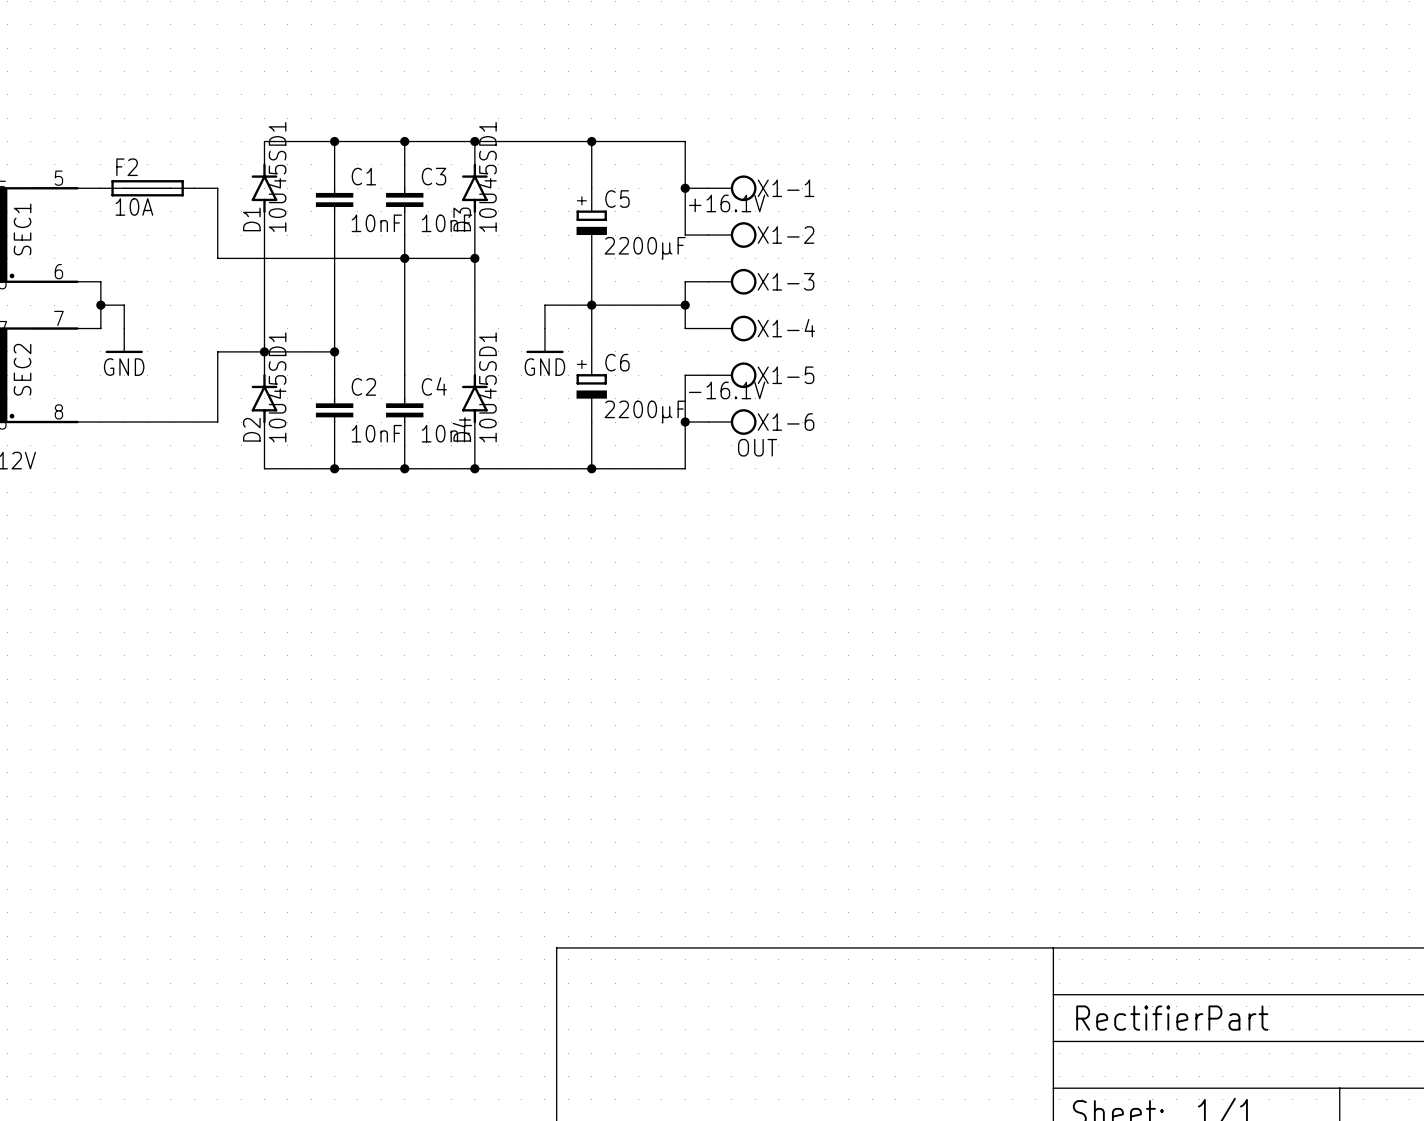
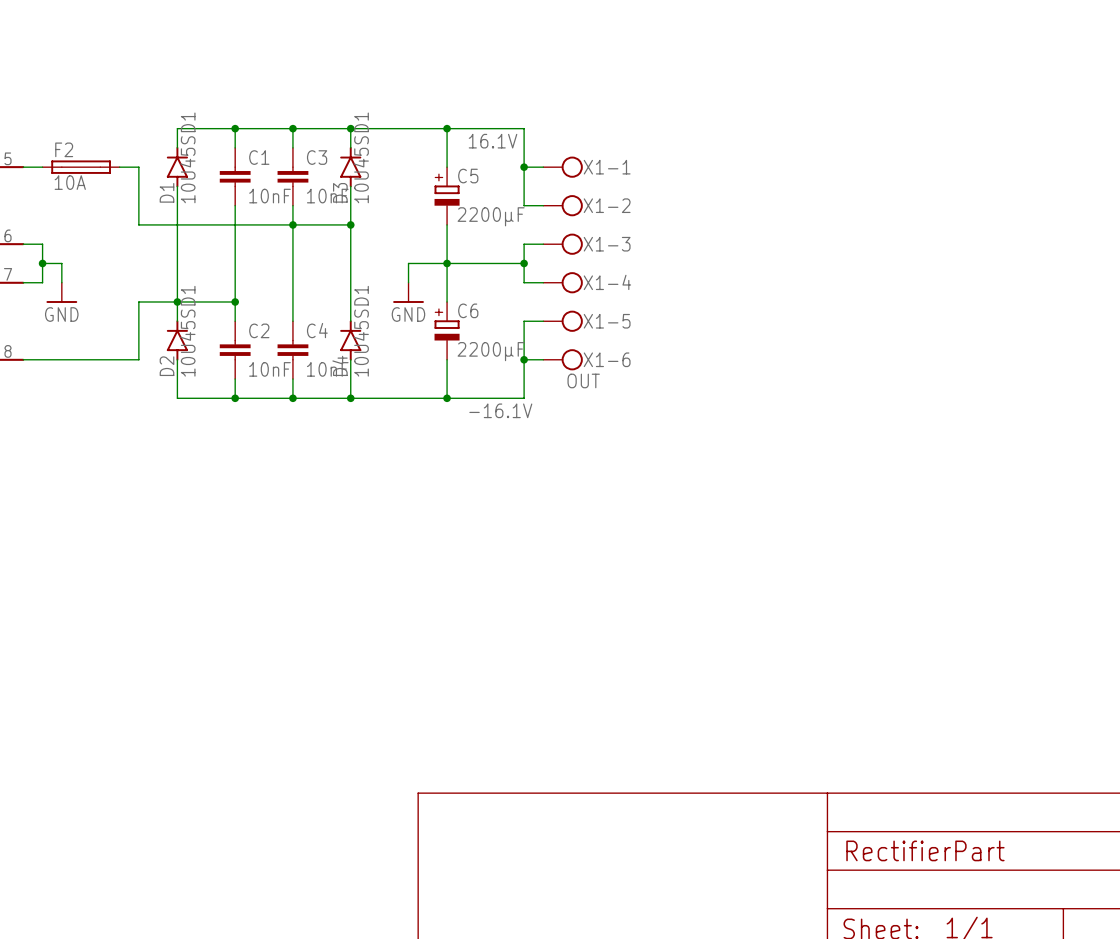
label: none -> 16.1V (493, 141)
label: +16.1V (727, 203) -> none
label position: -16.1V (727, 390) -> -16.1V (500, 410)

